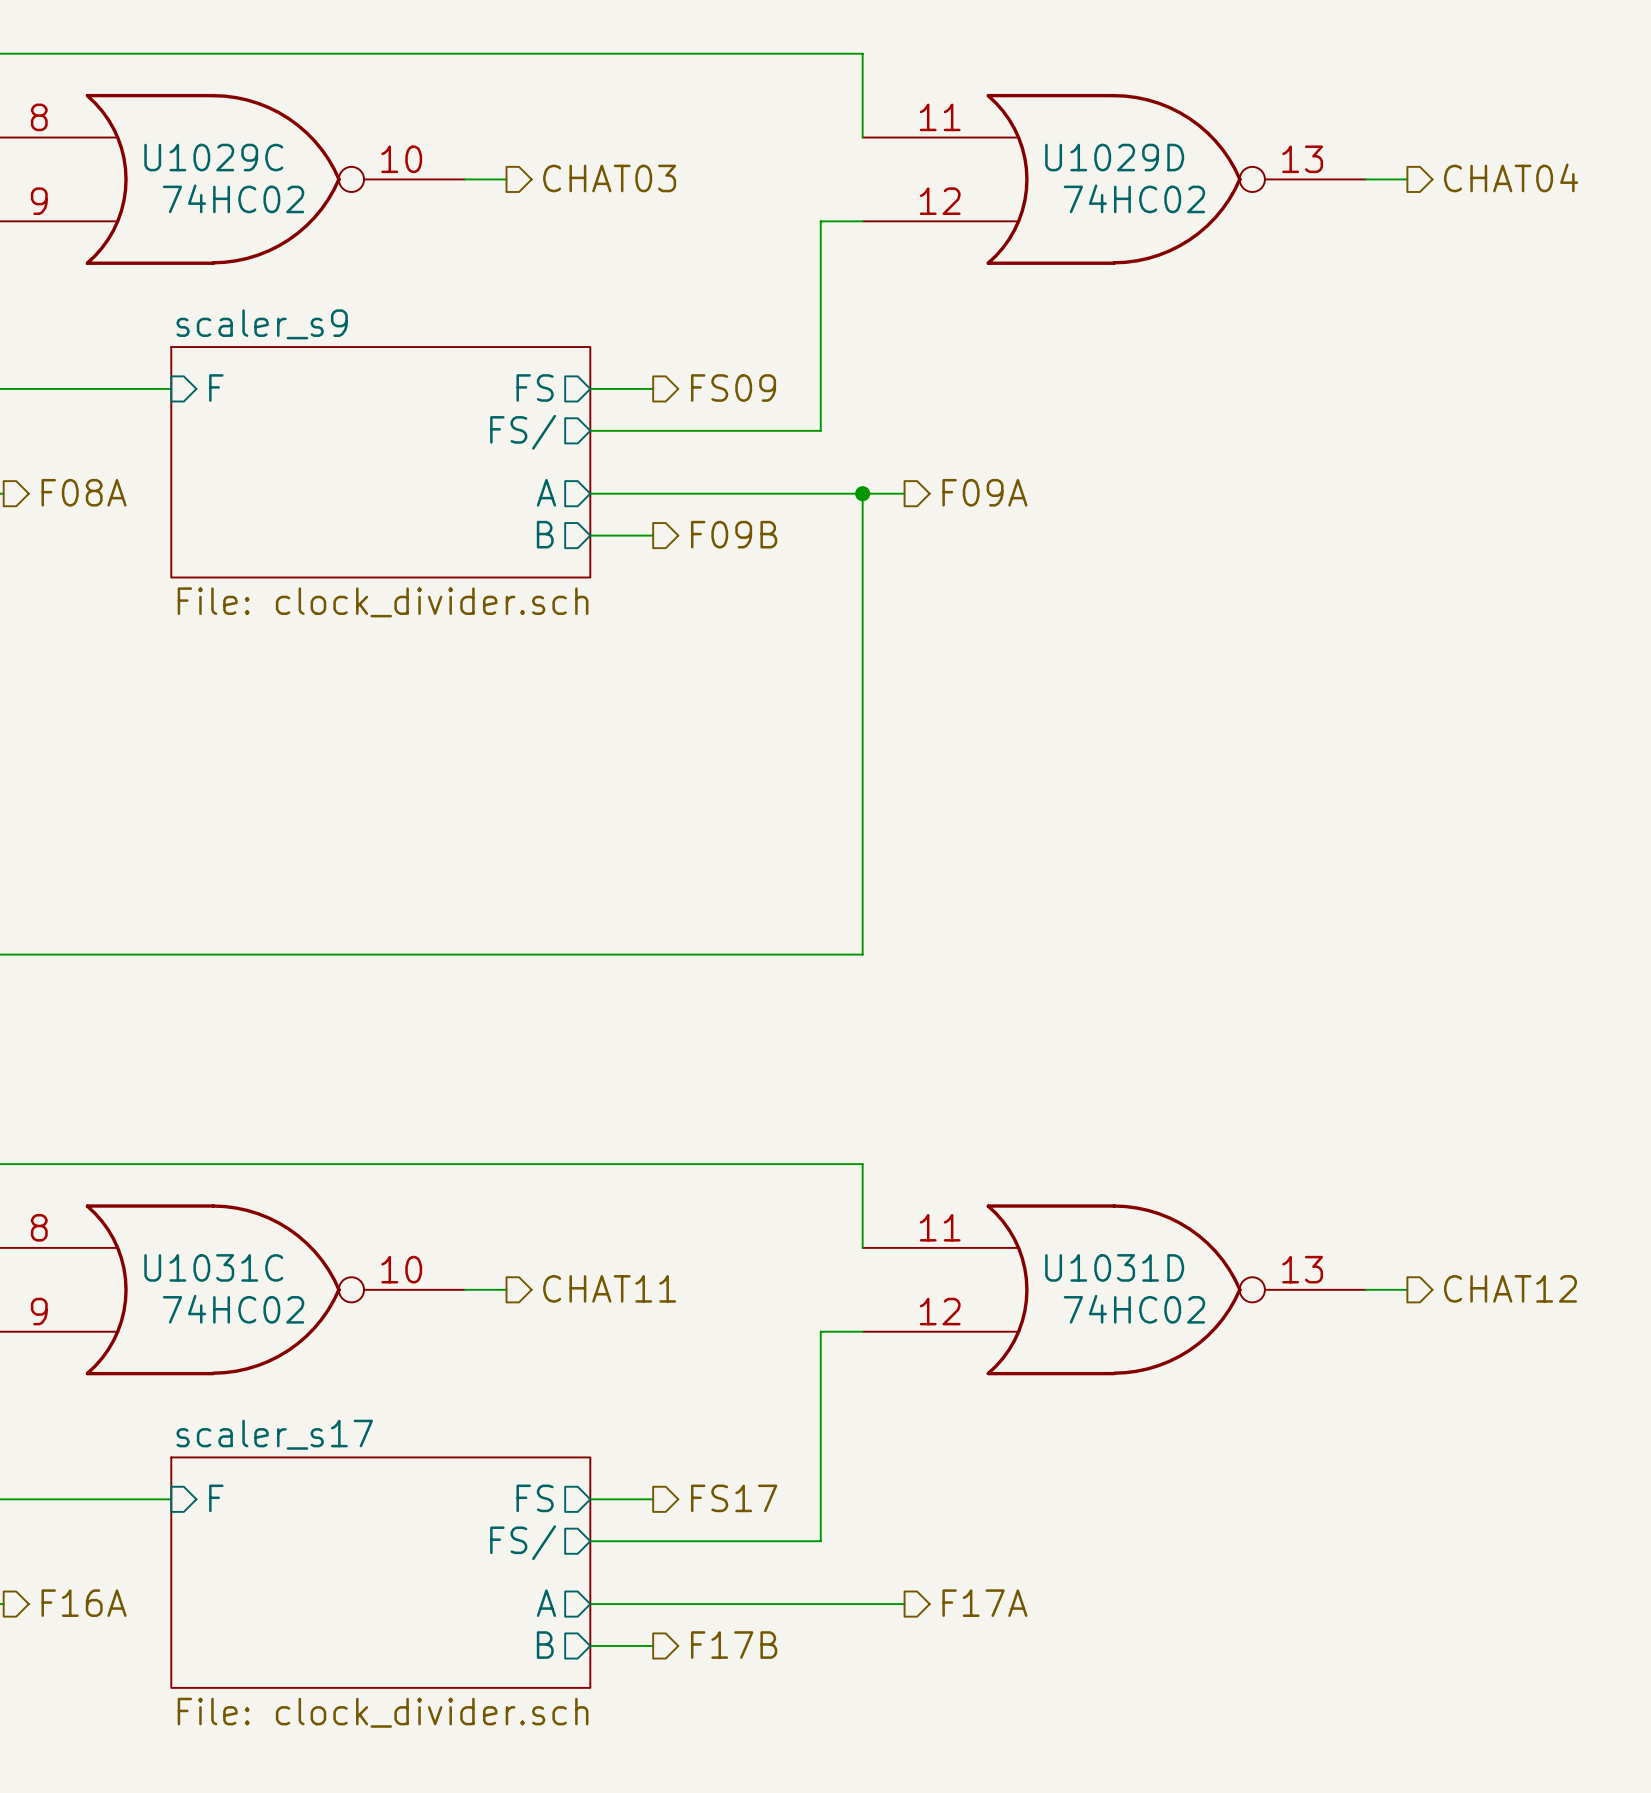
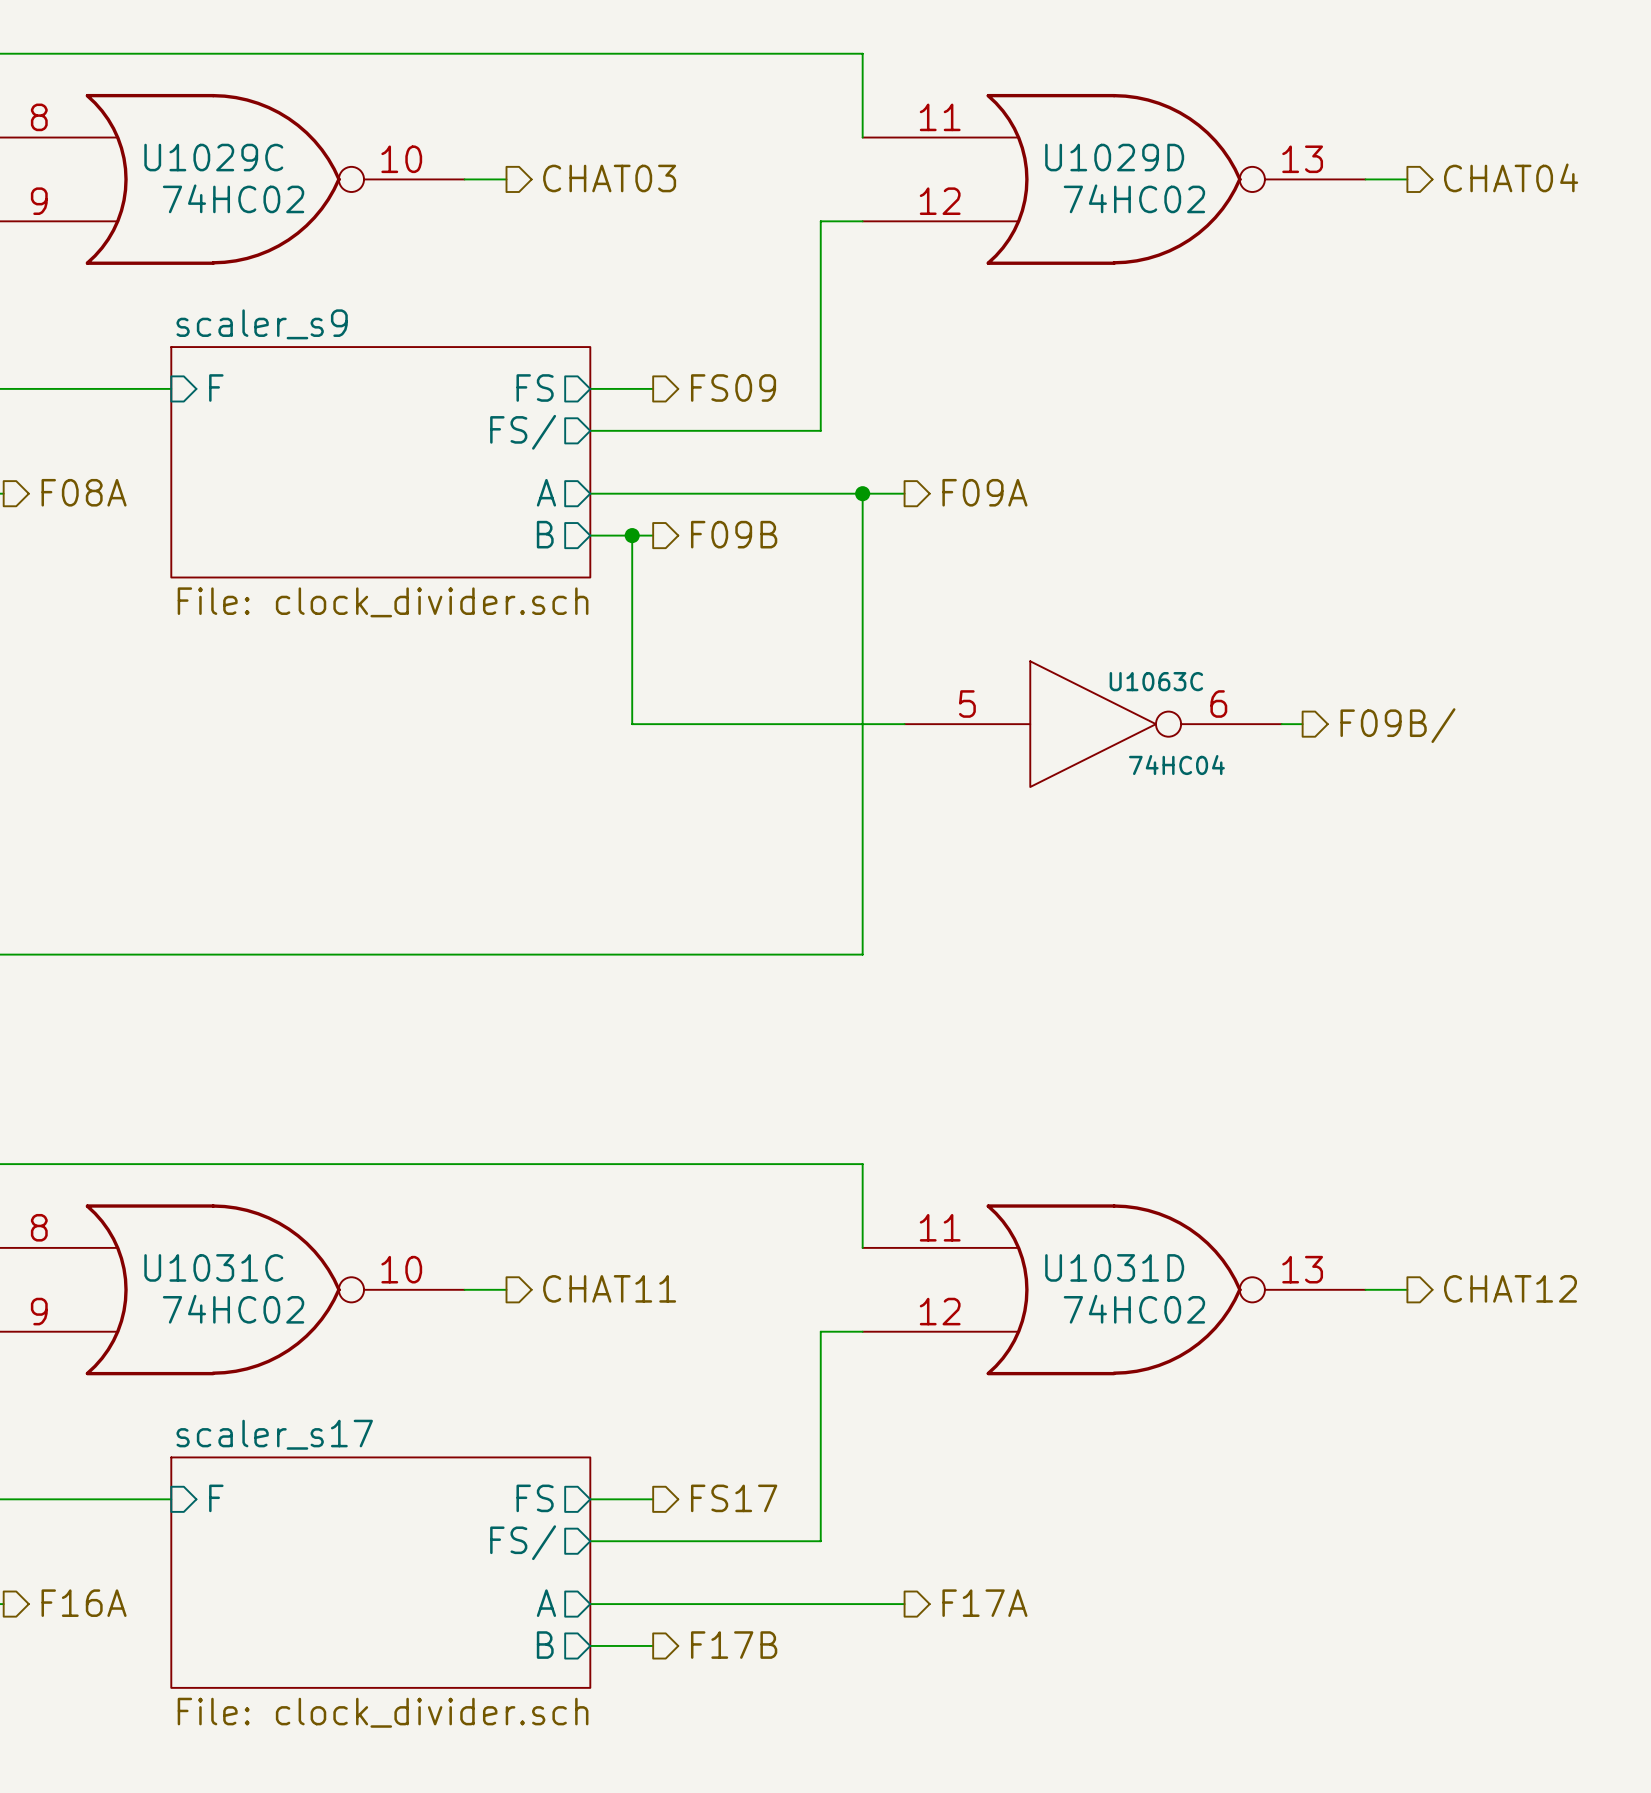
wire: none -> (632, 535) (632, 724) (904, 724)
junction: none -> (632, 535)
U1063C: none -> 74HC04 (1093, 724)
wire: none -> (1281, 724) (1302, 724)
hierarchical label: none -> F09B/ (1397, 725)

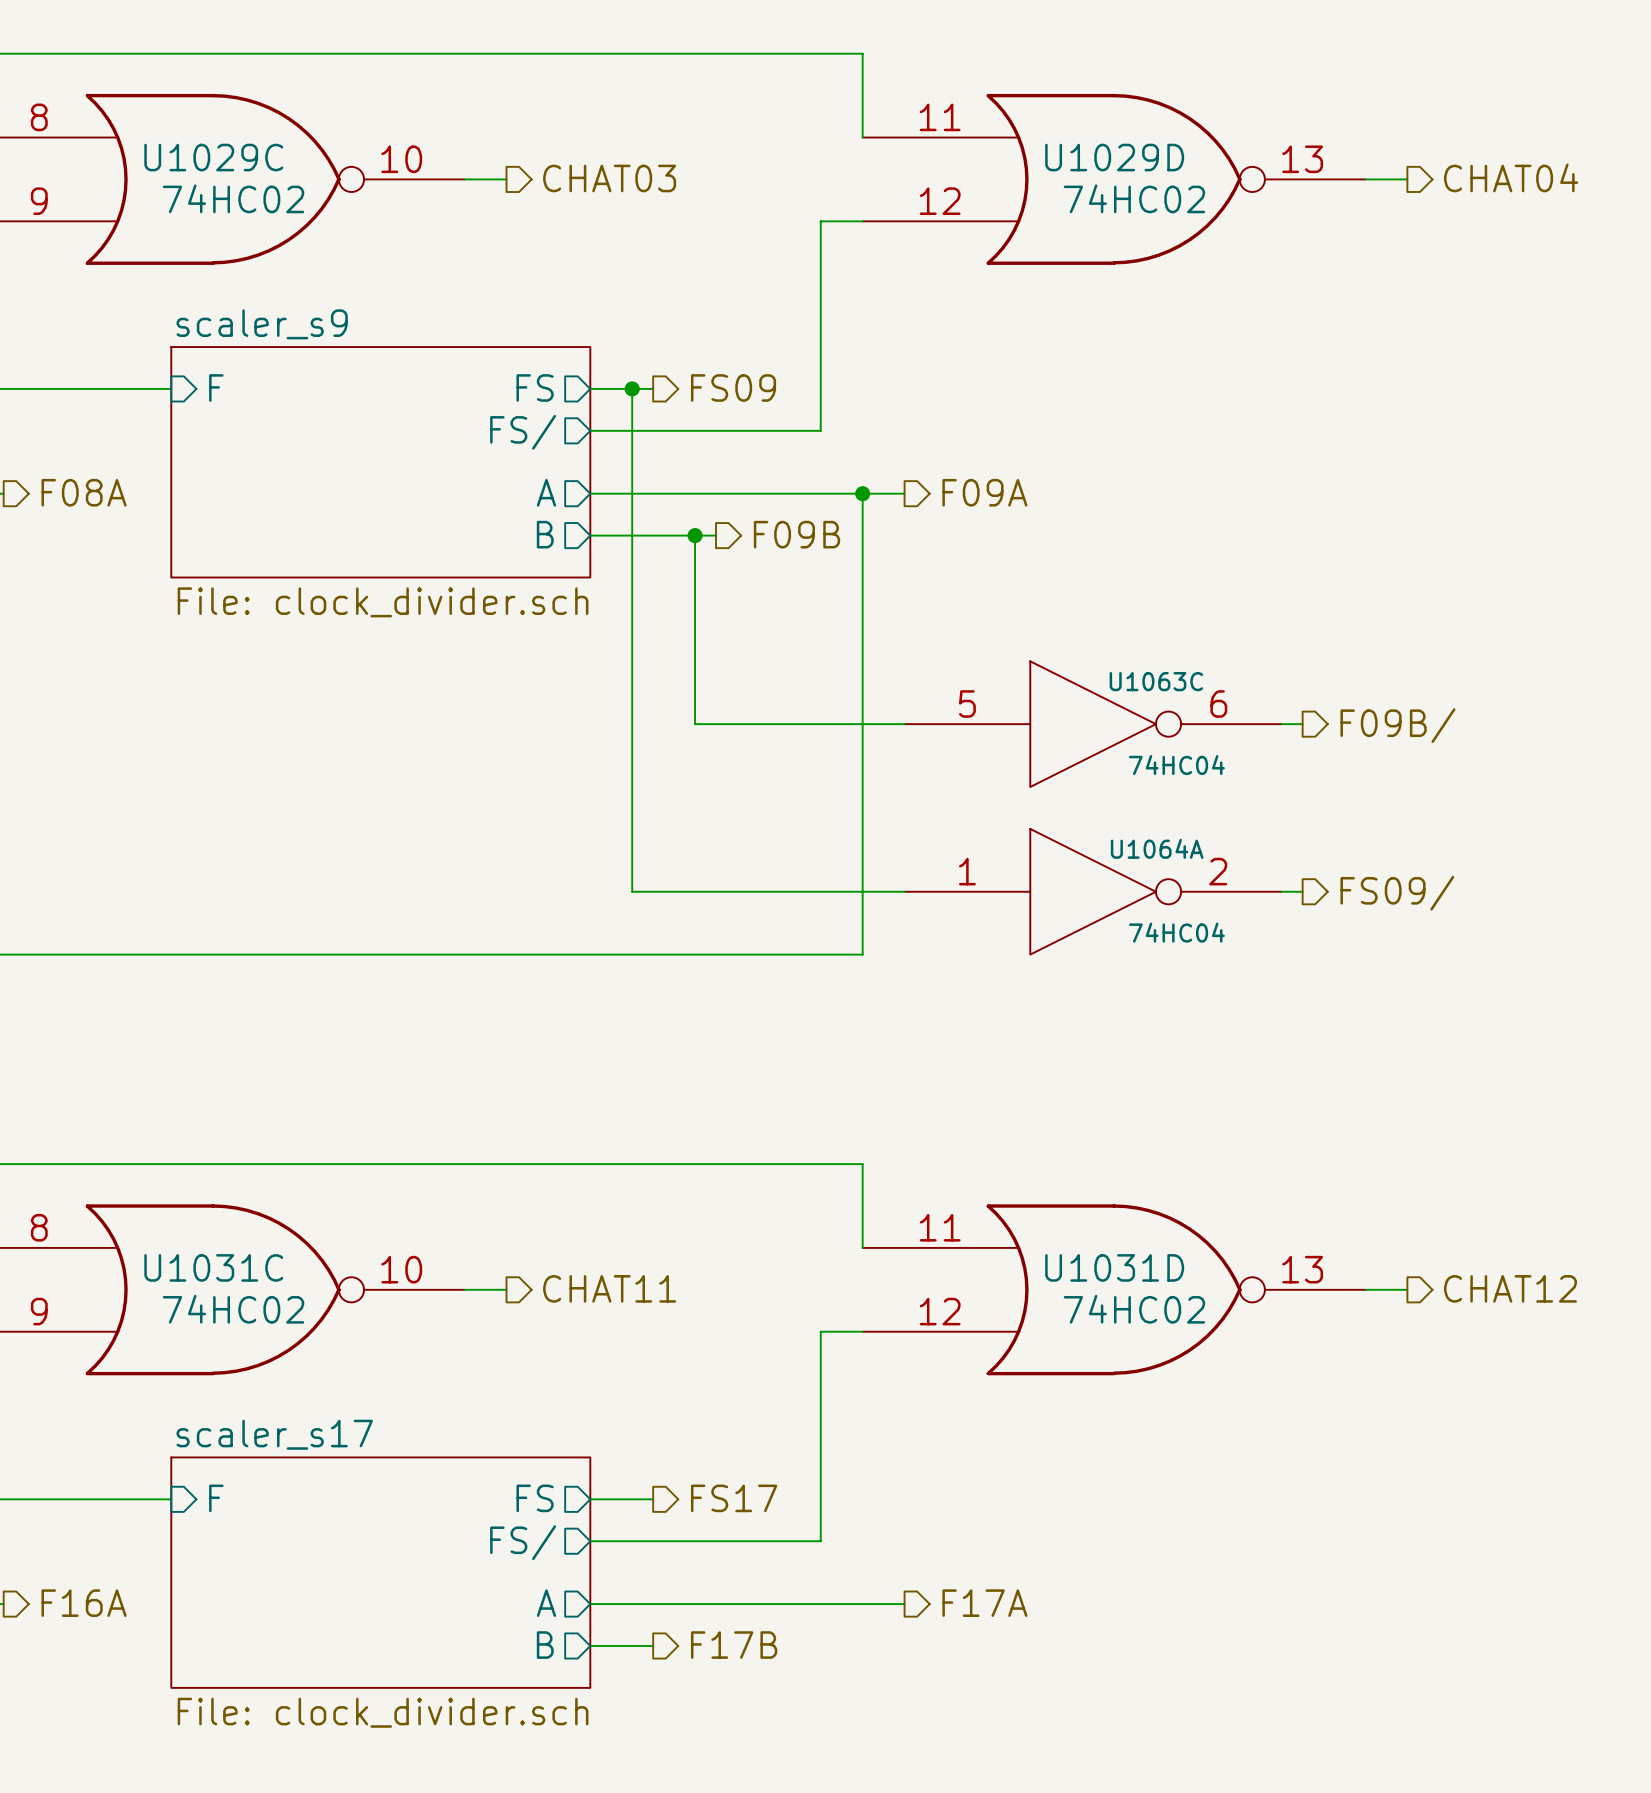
wire: none -> (632, 388) (632, 535)
junction: none -> (632, 388)
hierarchical label position: F09B (734, 534) -> F09B (796, 534)
junction position: (632, 535) -> (695, 535)
wire: none -> (653, 535) (716, 535)
wire: (632, 724) (695, 724) -> (695, 535) (695, 724)
wire: none -> (632, 724) (632, 891) (904, 891)
U1064A: none -> 74HC04 (1093, 891)
wire: none -> (1281, 891) (1302, 891)
hierarchical label: none -> FS09/ (1397, 893)

